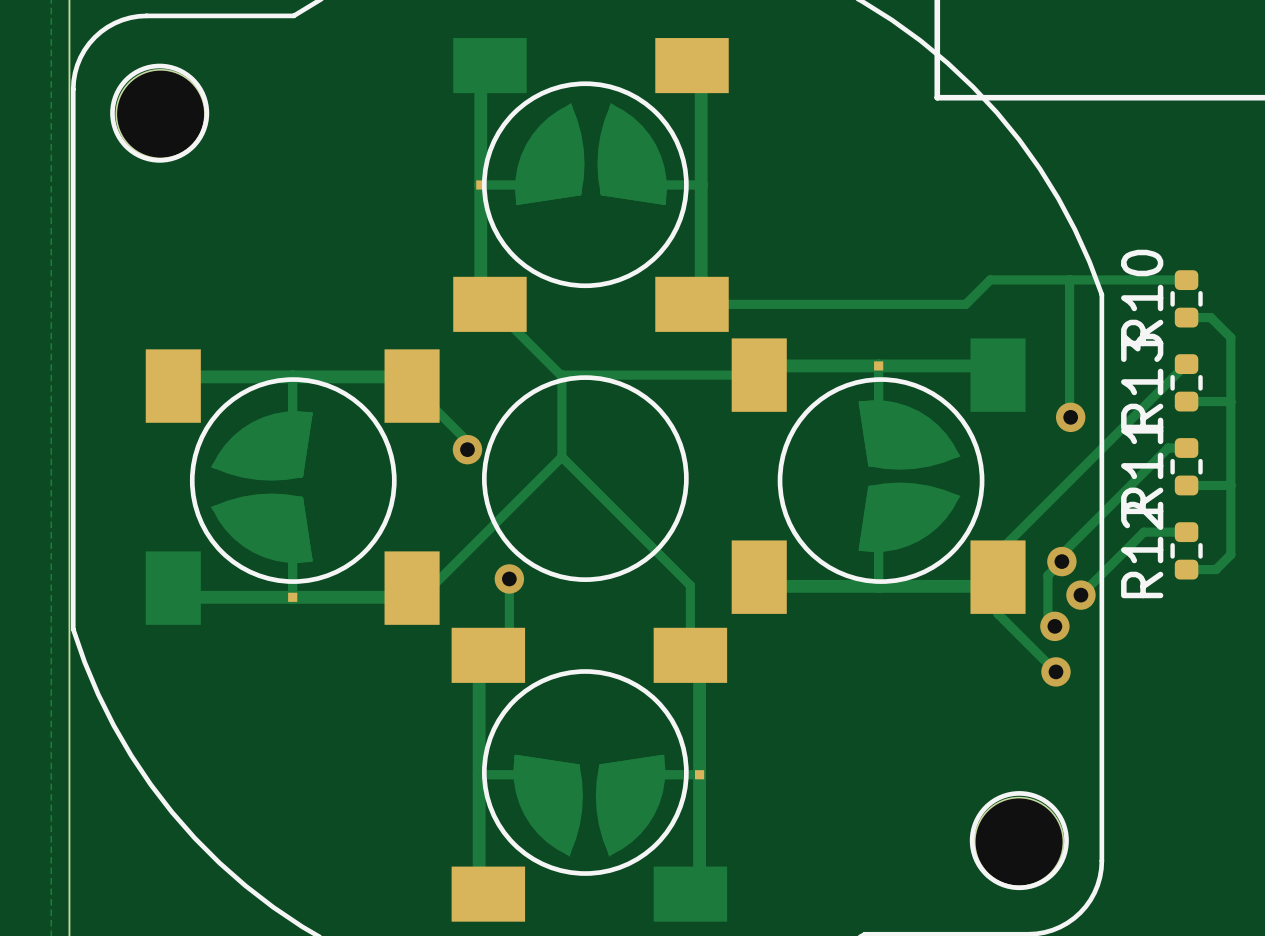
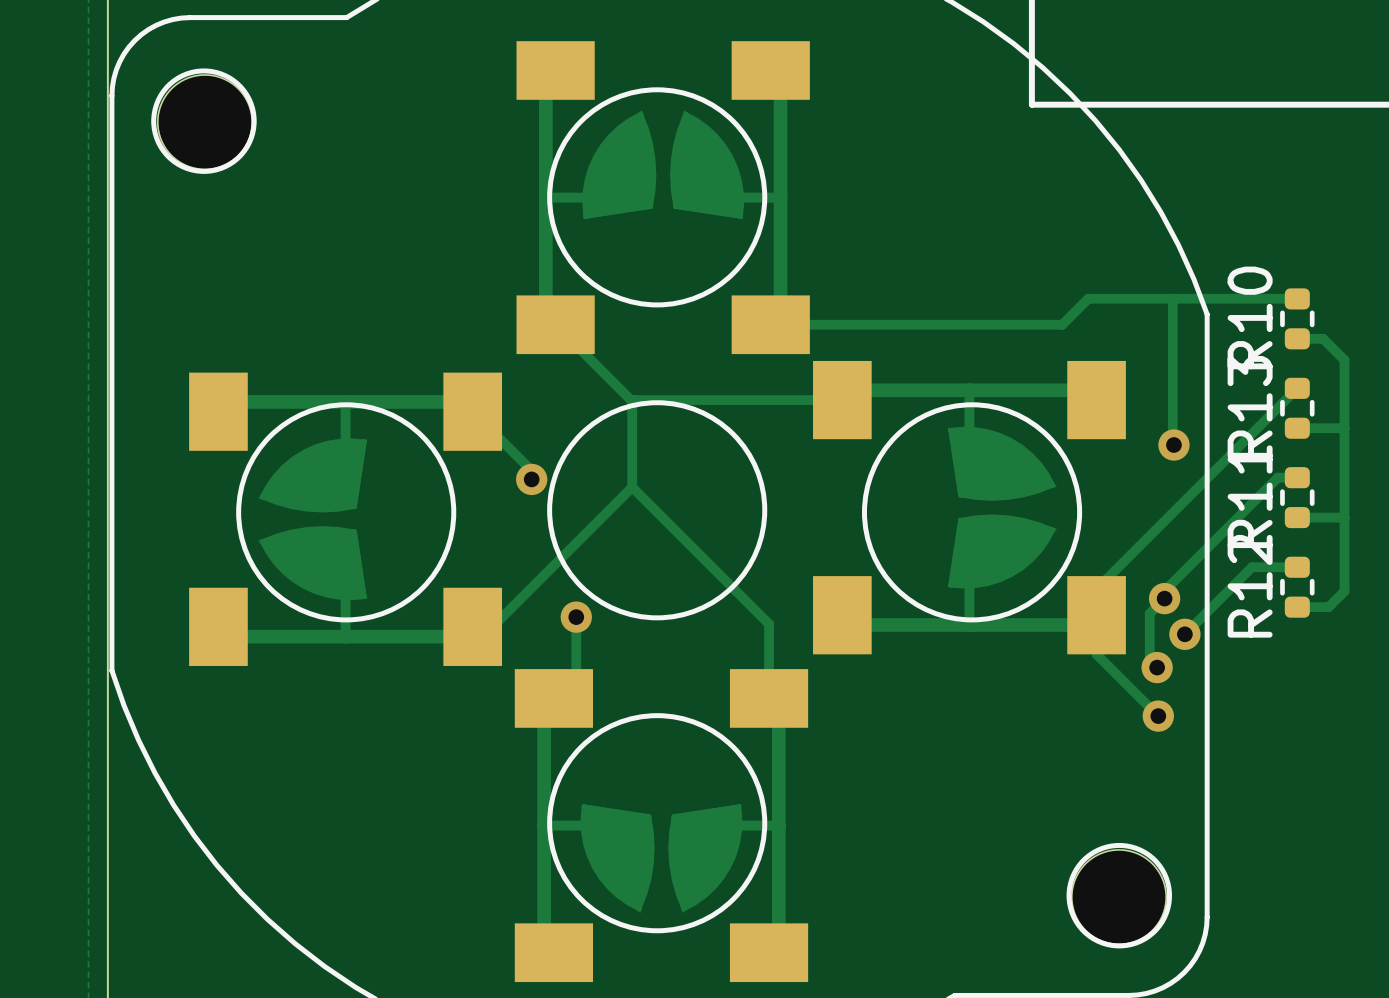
part footprint: [453, 38, 729, 332] -> [516, 41, 810, 355]
part footprint: [731, 338, 1026, 614] -> [813, 360, 1126, 655]
part footprint: [145, 349, 440, 625] -> [189, 372, 503, 666]
part footprint: [451, 627, 728, 922] -> [514, 669, 809, 983]

